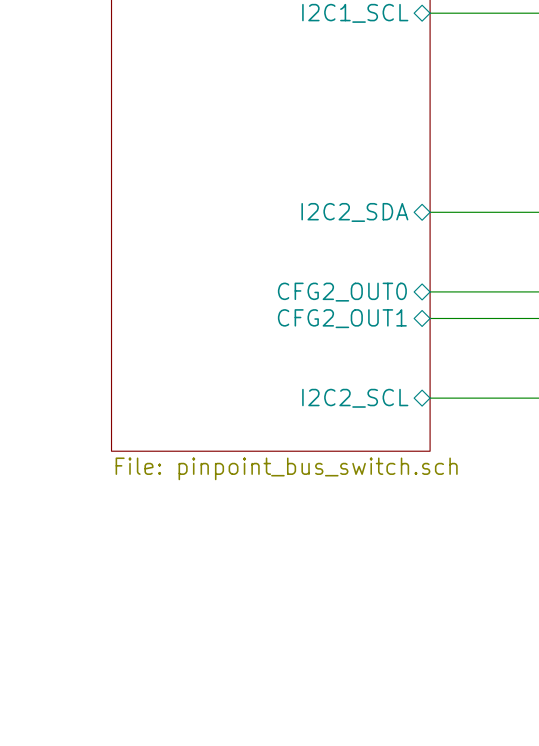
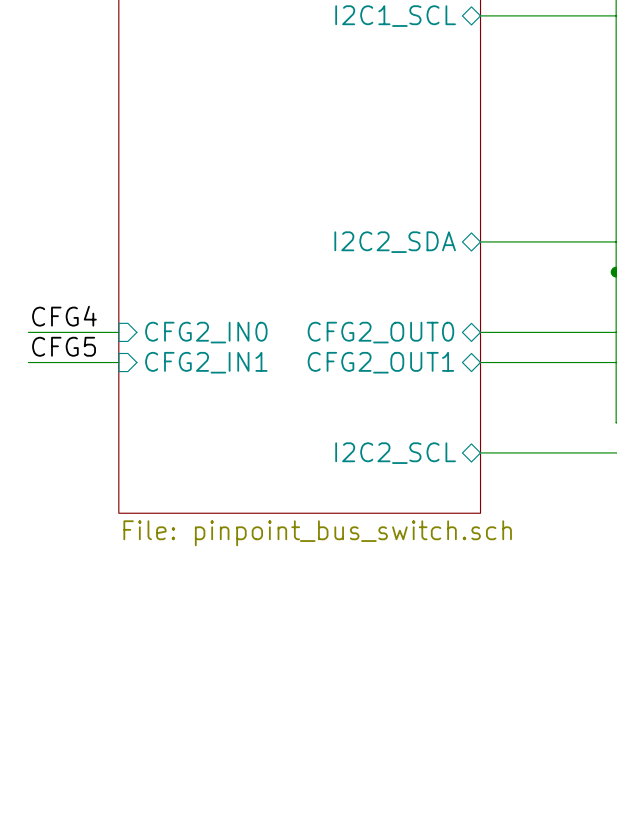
label: none -> CFG4 (64, 316)
wire: none -> (28, 332) (118, 332)
sheet pin: none -> CFG2_IN0 (206, 332)
label: none -> CFG5 (64, 346)
wire: none -> (28, 362) (118, 362)
sheet pin: none -> CFG2_IN1 (206, 362)

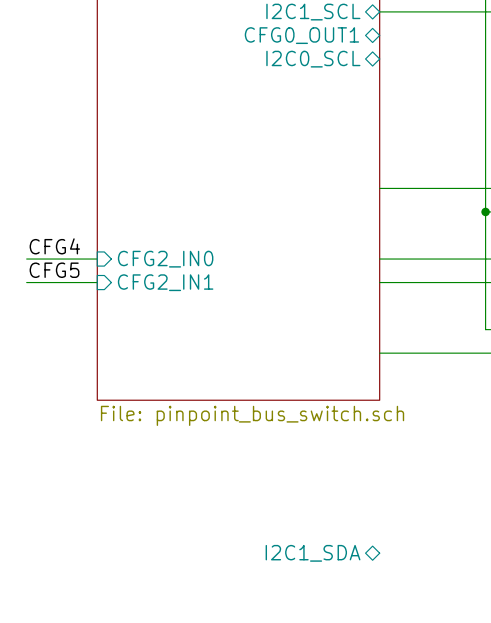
sheet pin: none -> CFG0_OUT1 (301, 35)
sheet pin: none -> I2C0_SCL (313, 59)
sheet pin: I2C2_SDA (395, 242) -> none
sheet pin: CFG2_OUT0 (380, 332) -> none
sheet pin: CFG2_OUT1 (380, 362) -> none
sheet pin: I2C2_SCL (395, 453) -> none
sheet pin: none -> I2C1_SDA (313, 553)

